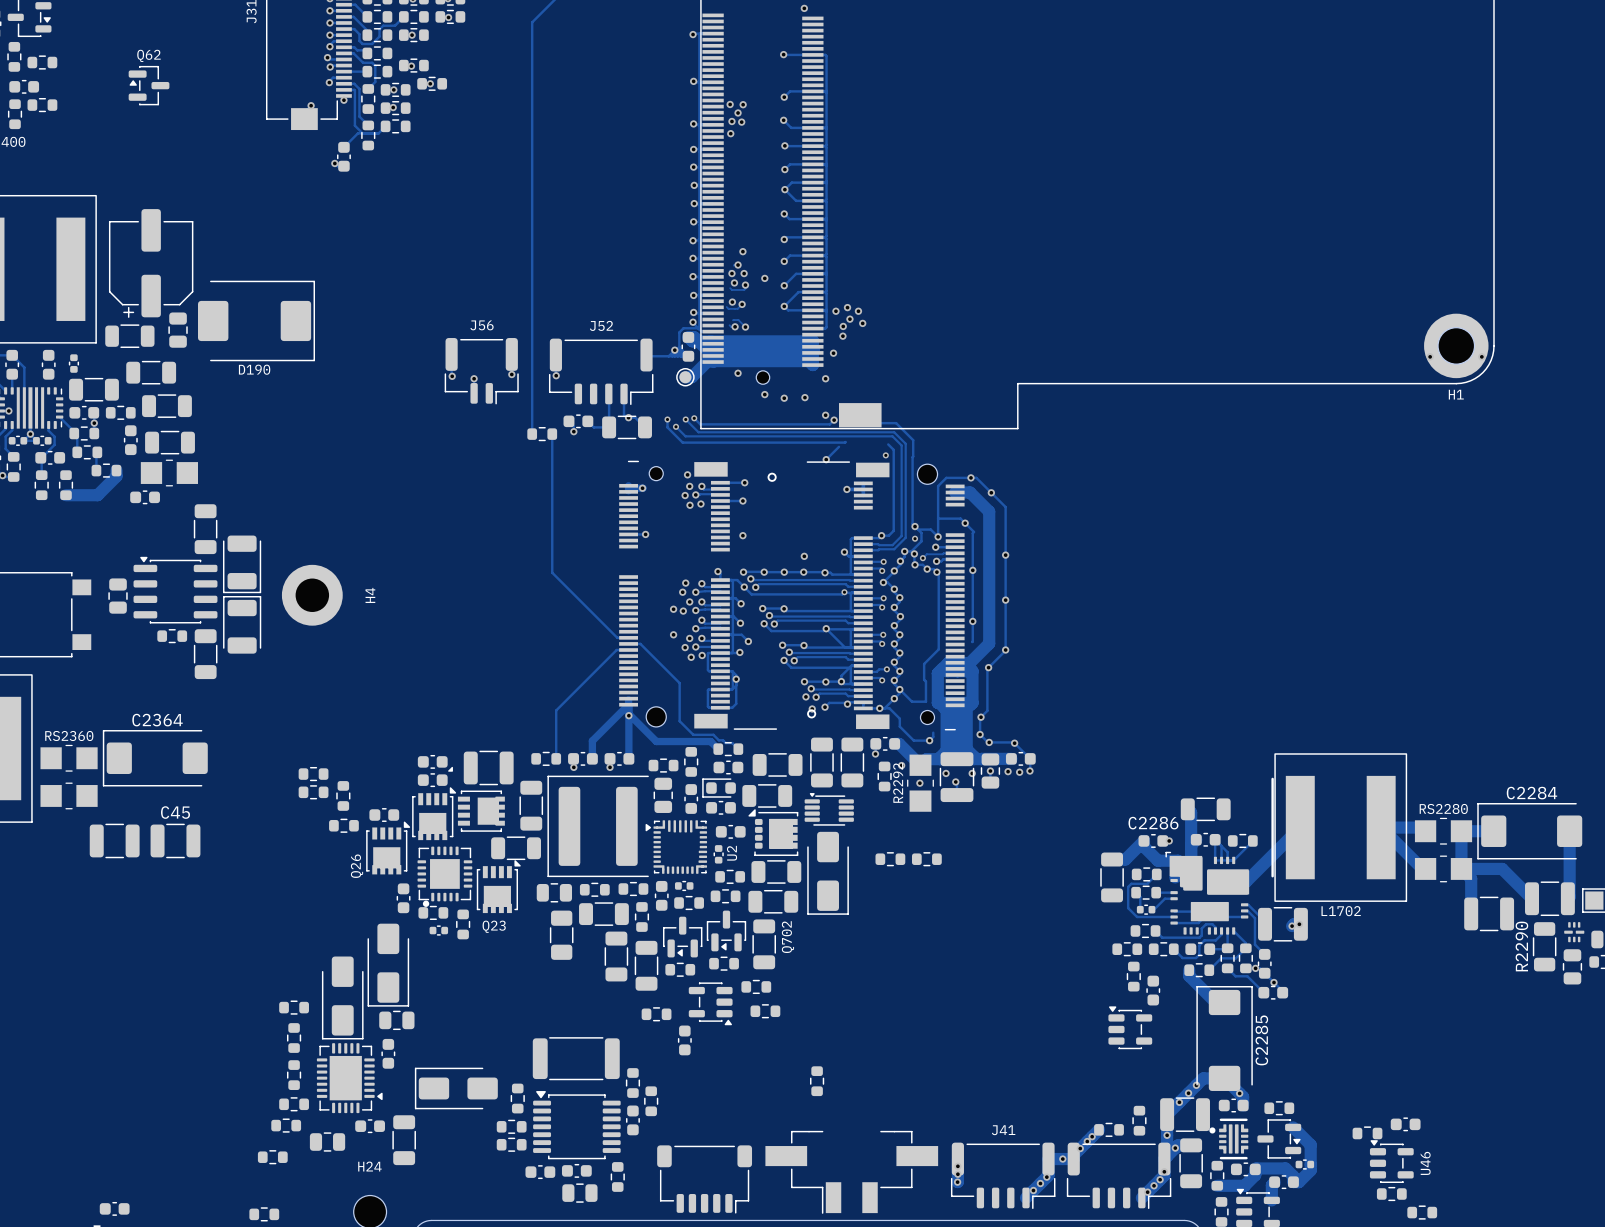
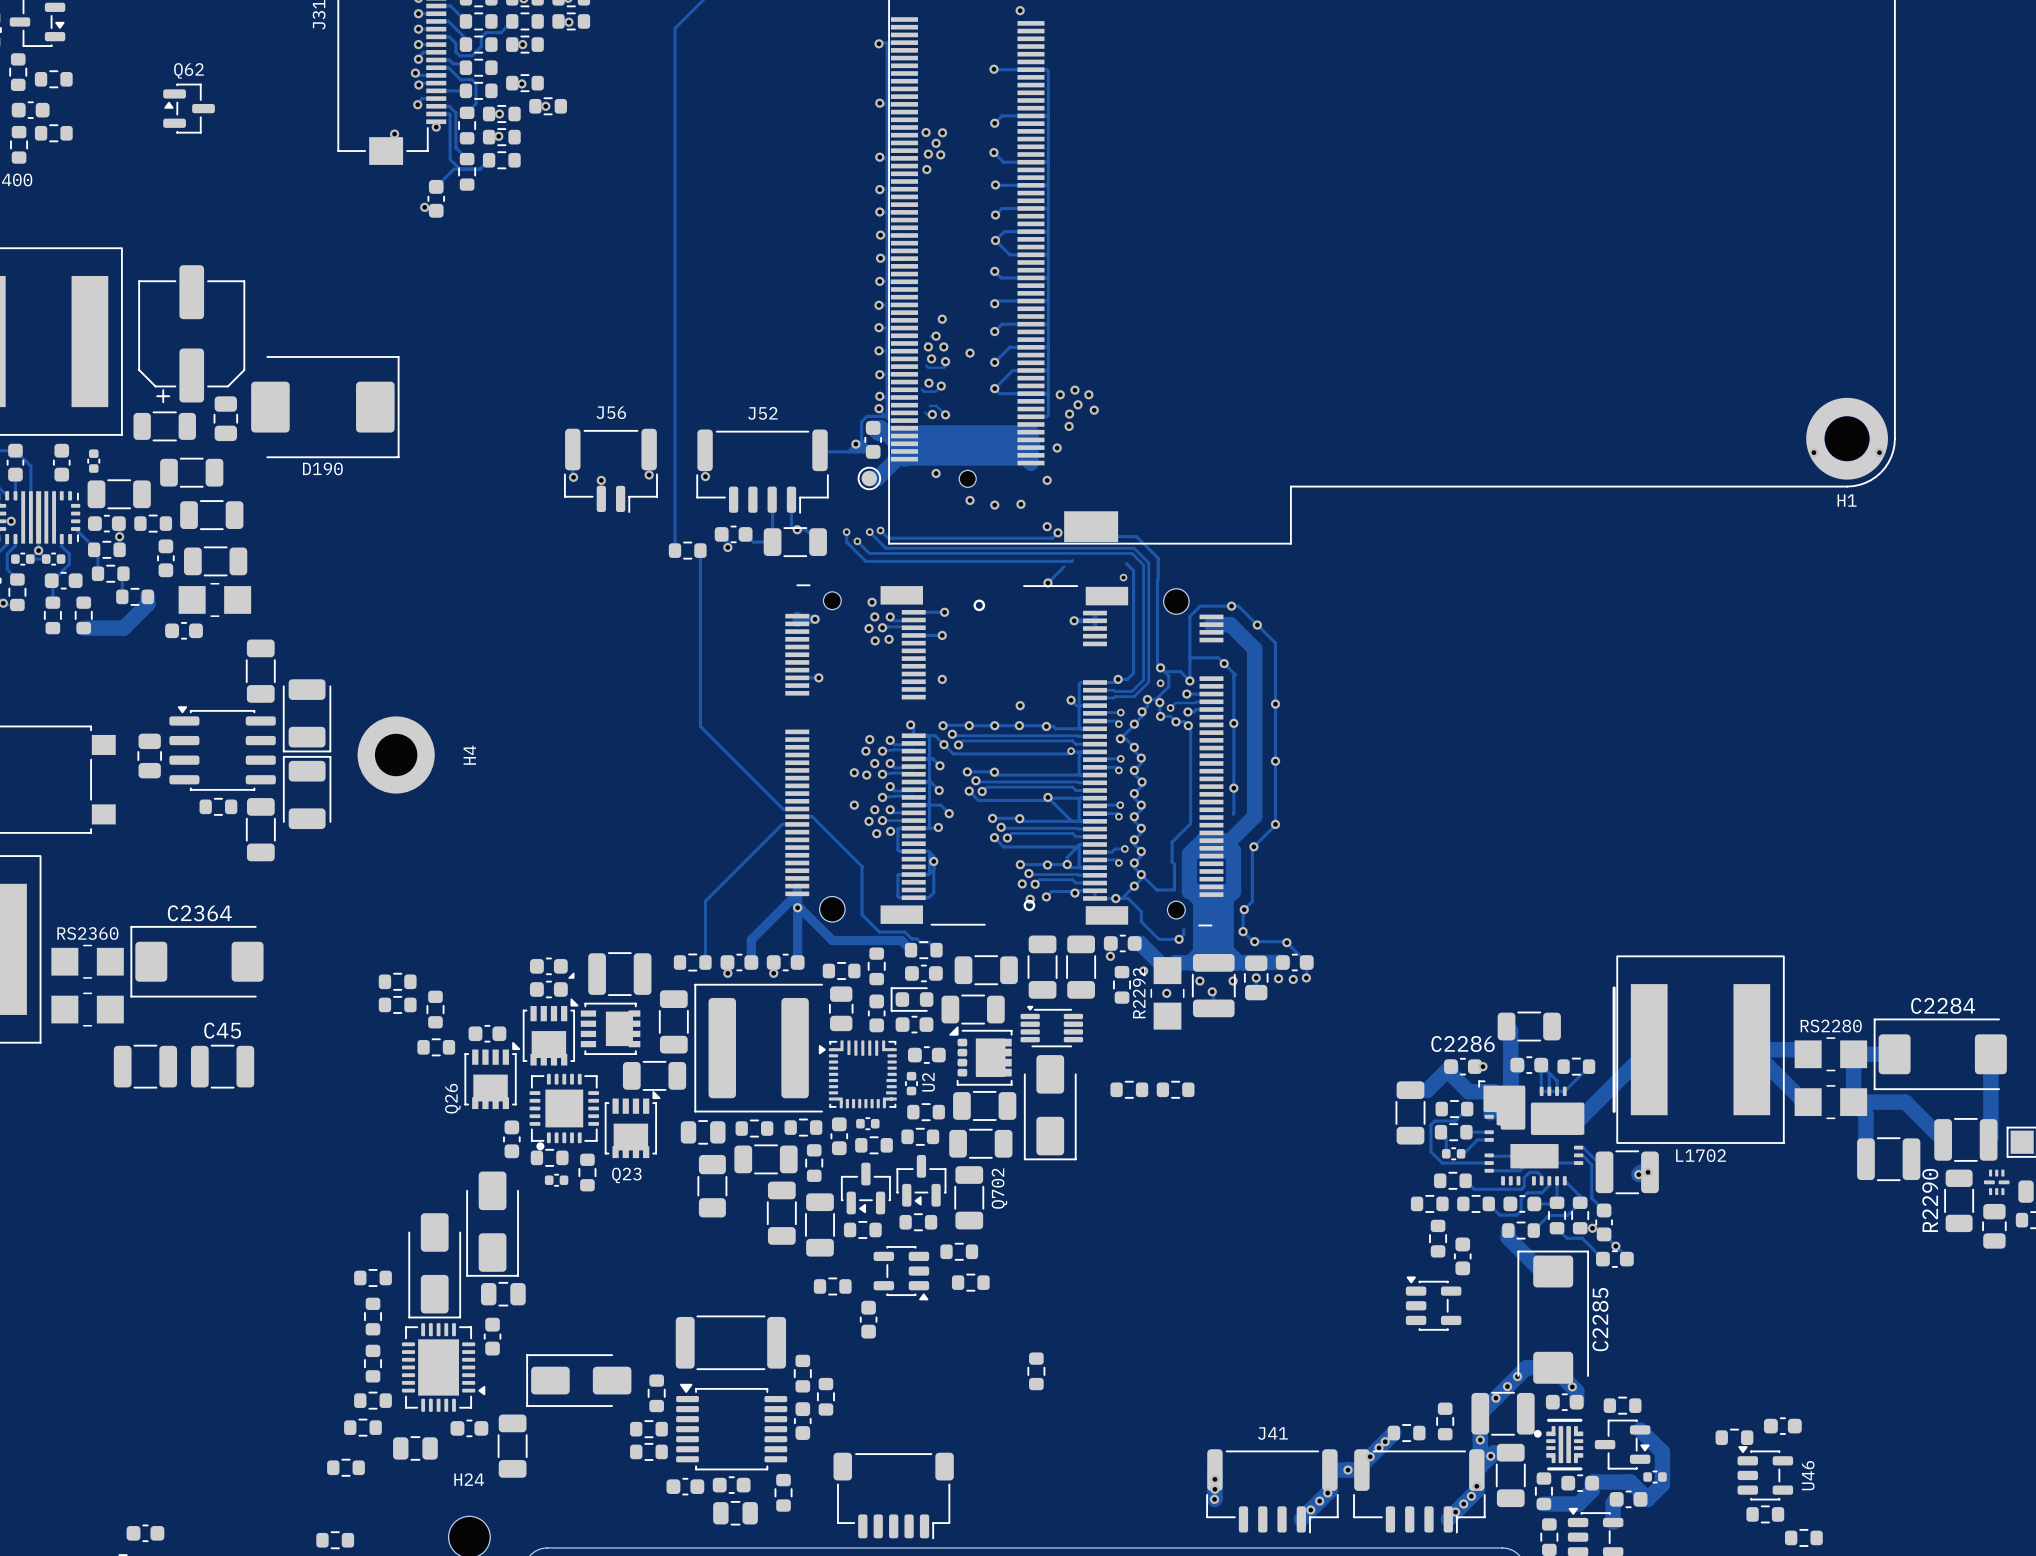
part: (851, 1172) -> none

